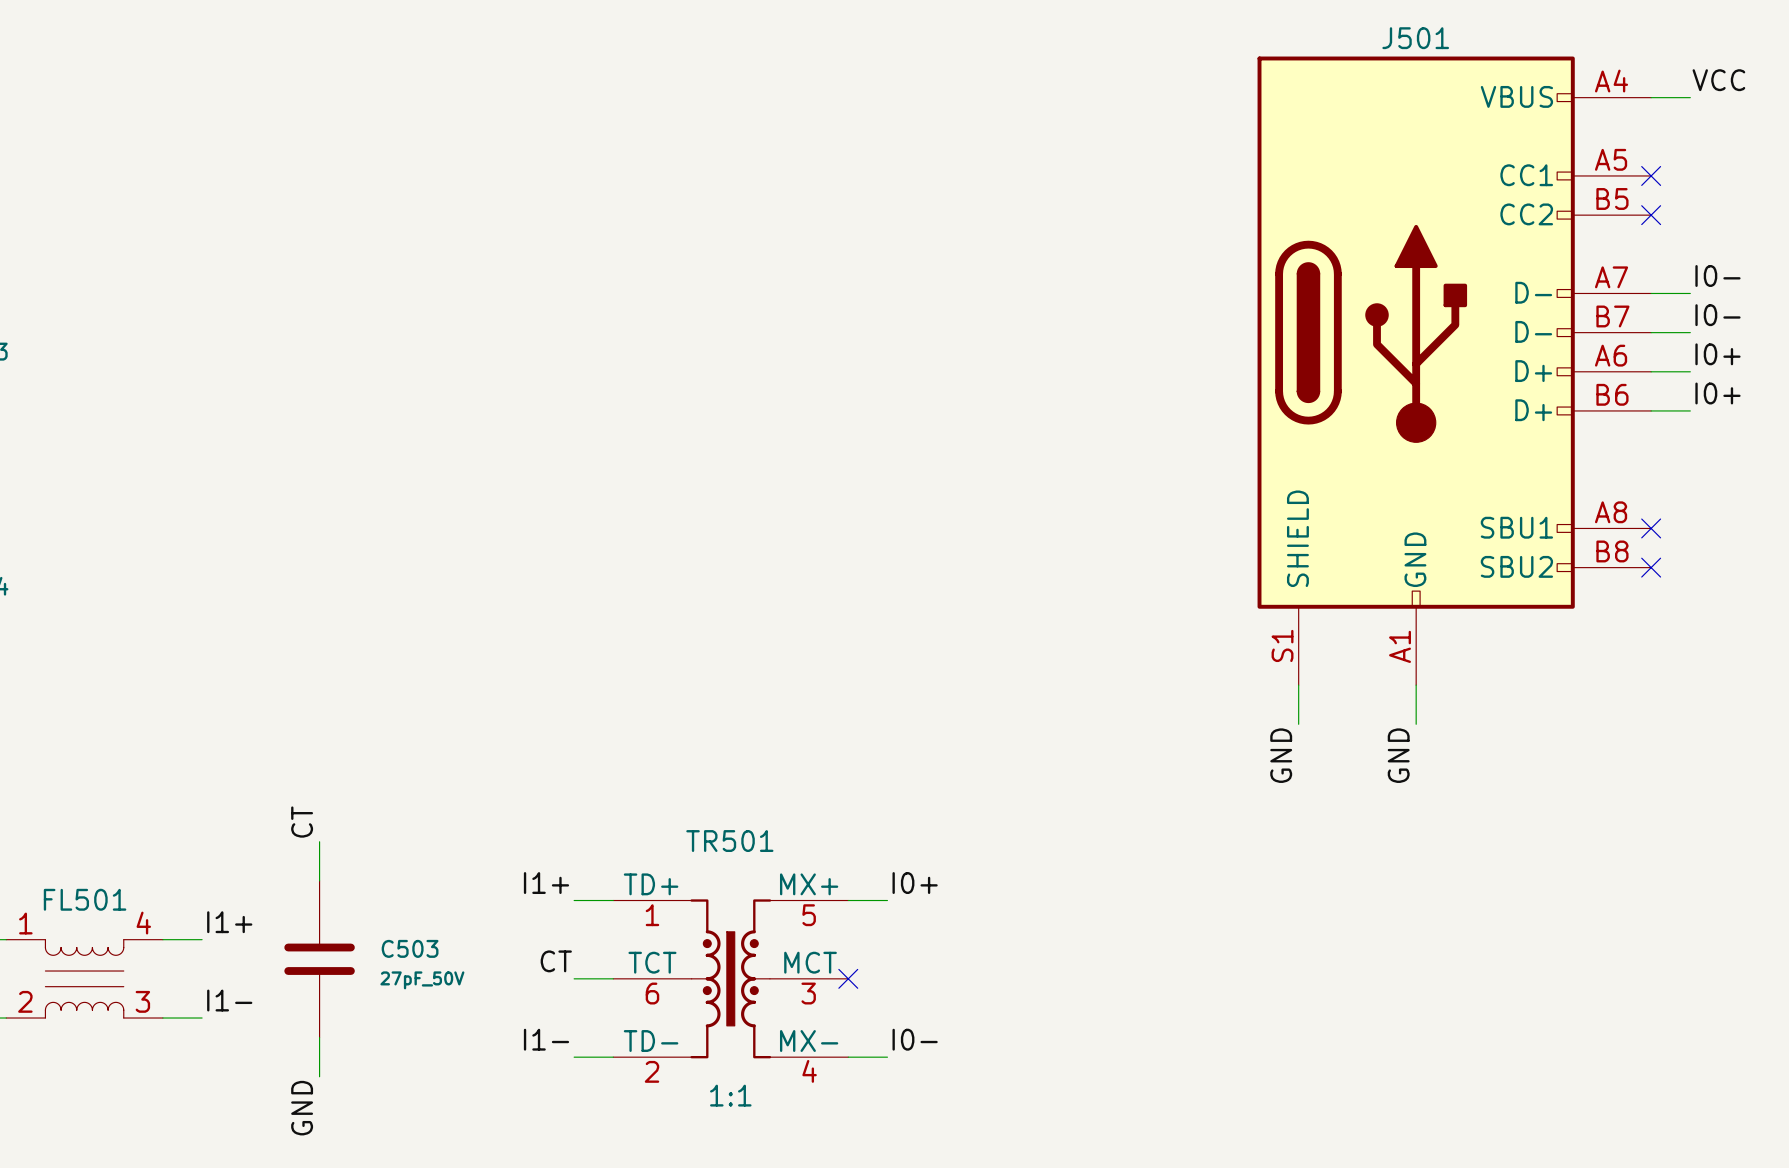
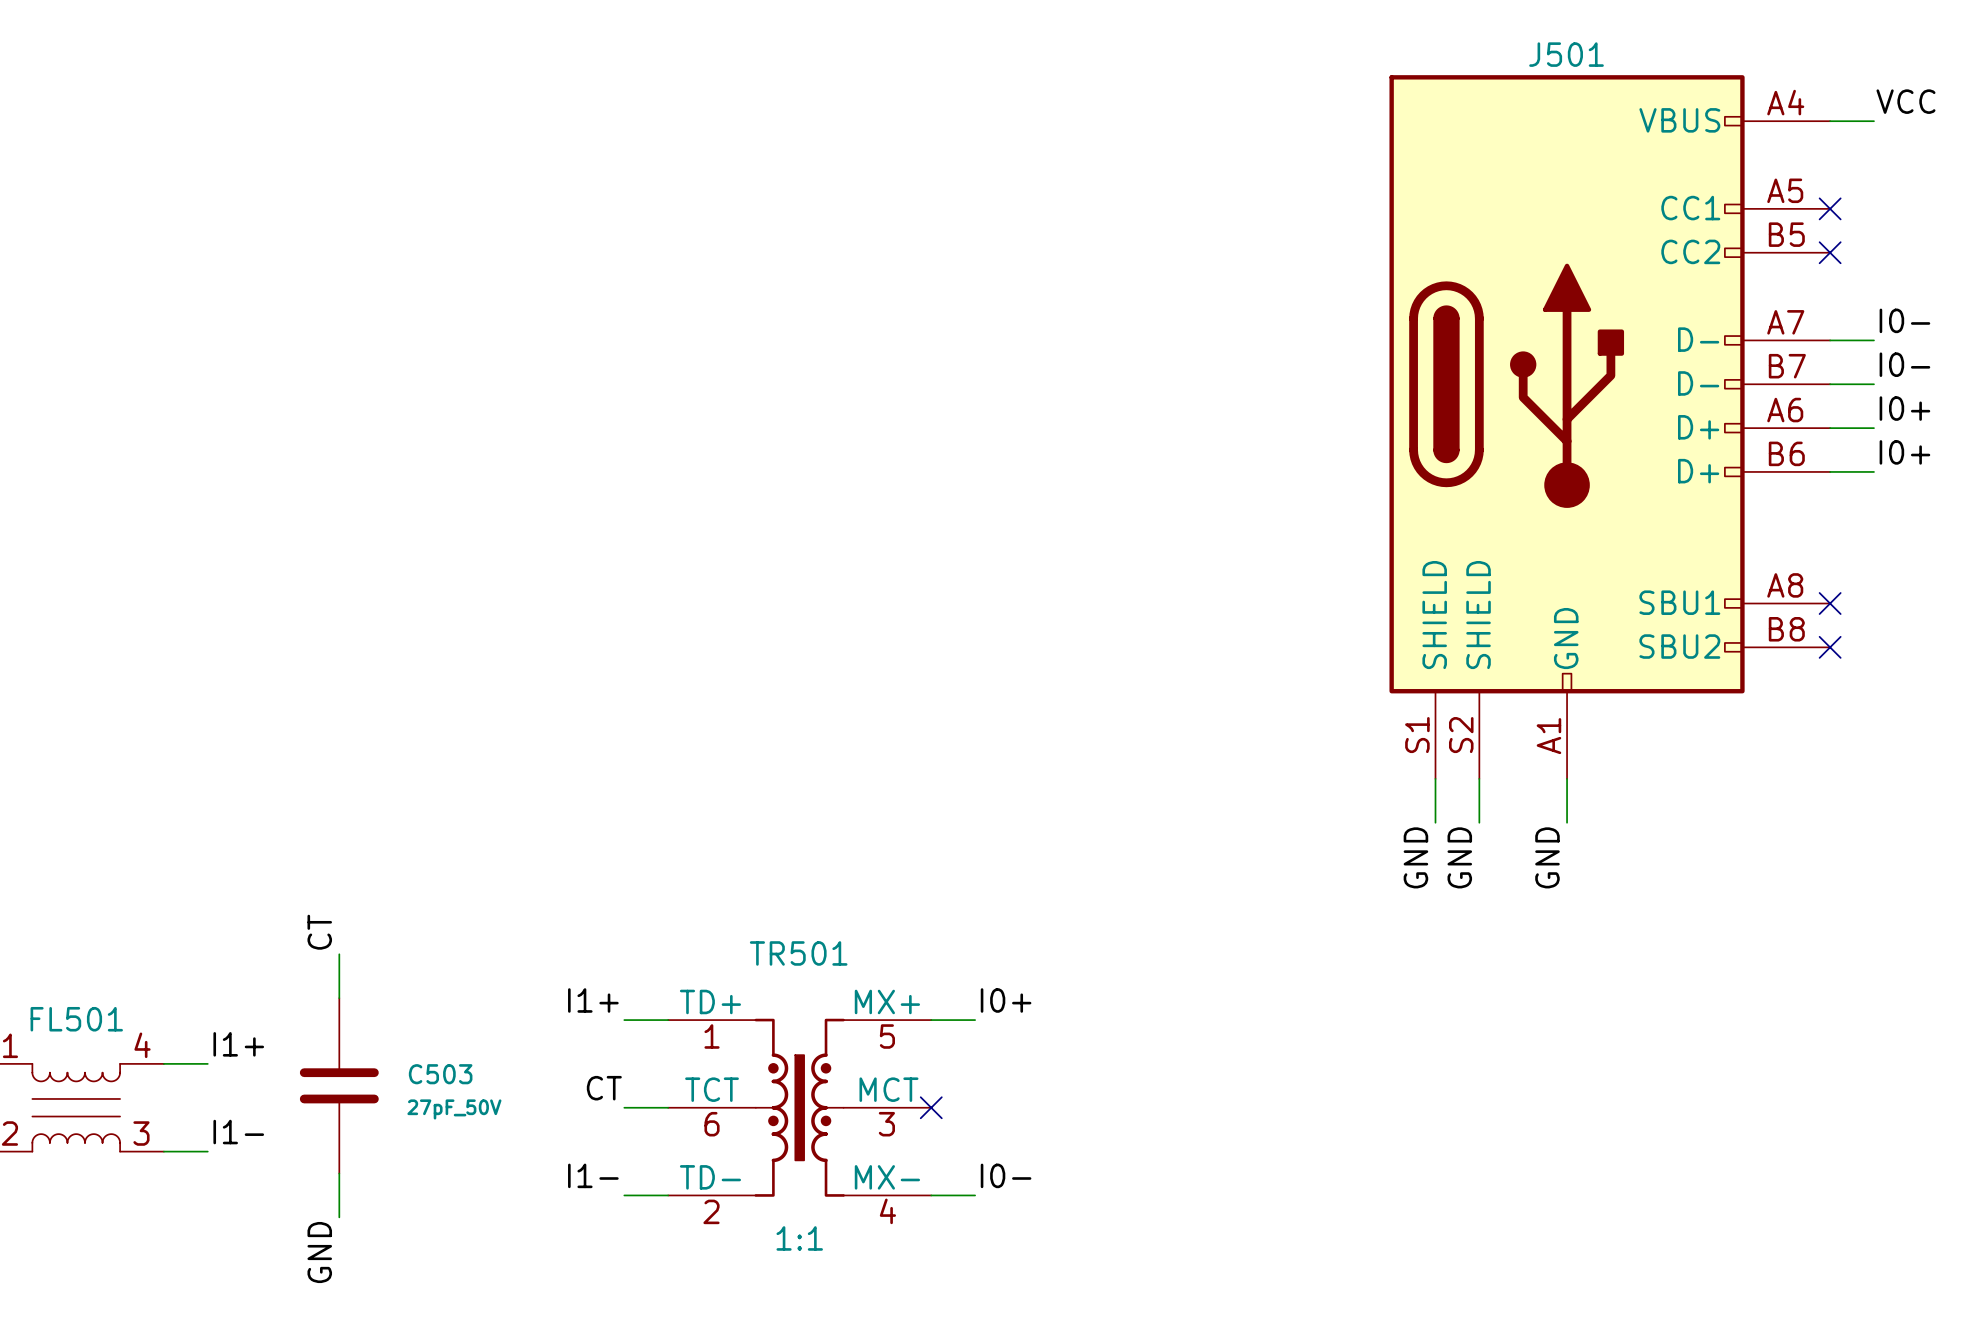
J501 symbol: [1257, 56, 1652, 686] -> [1389, 75, 1831, 779]
wire: none -> (1479, 778) (1479, 822)
label: none -> GND (1459, 857)

